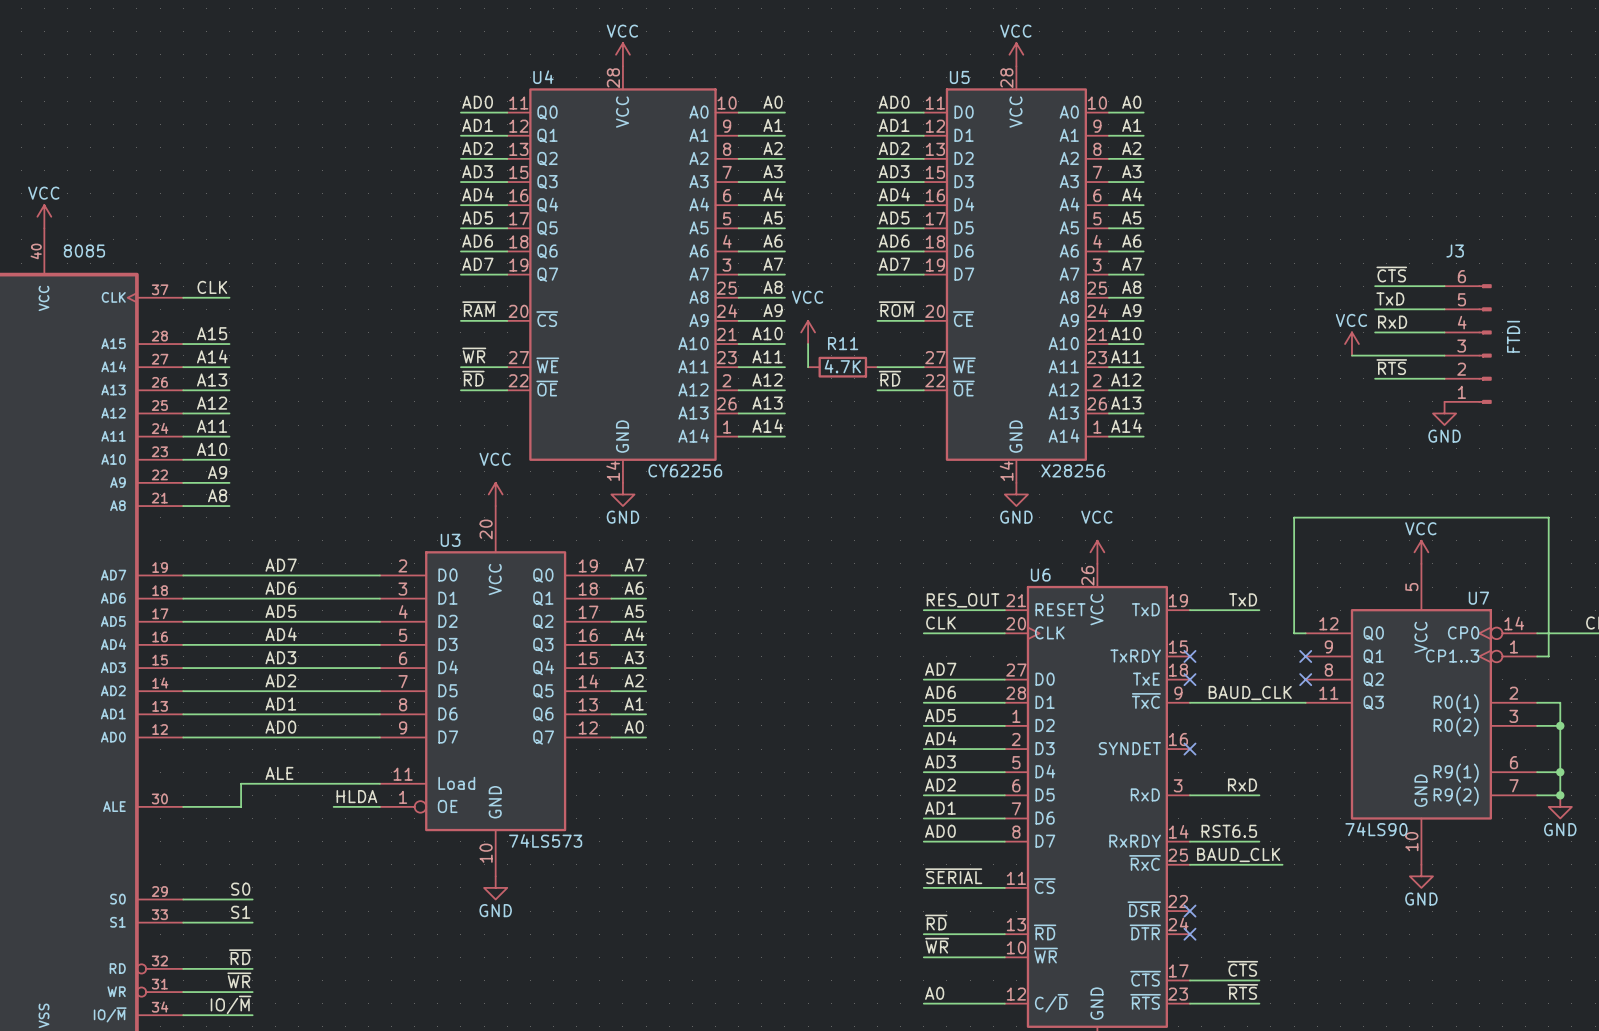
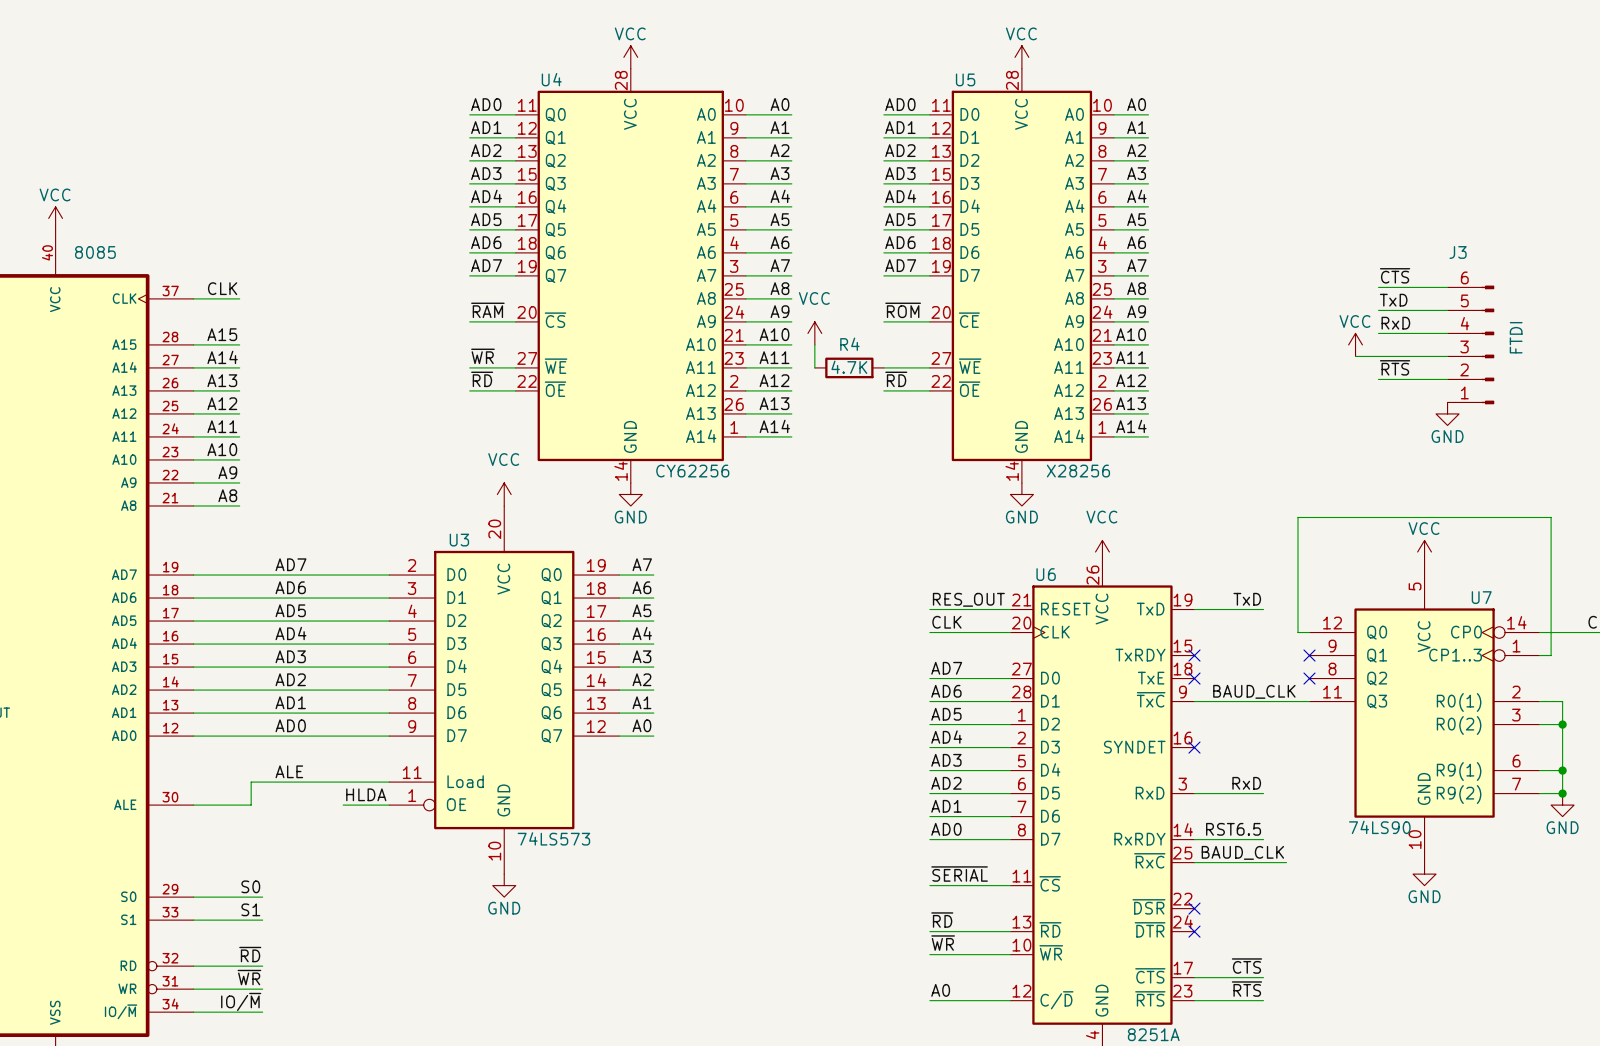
R11 name: R11 (843, 343) -> R4 (849, 344)

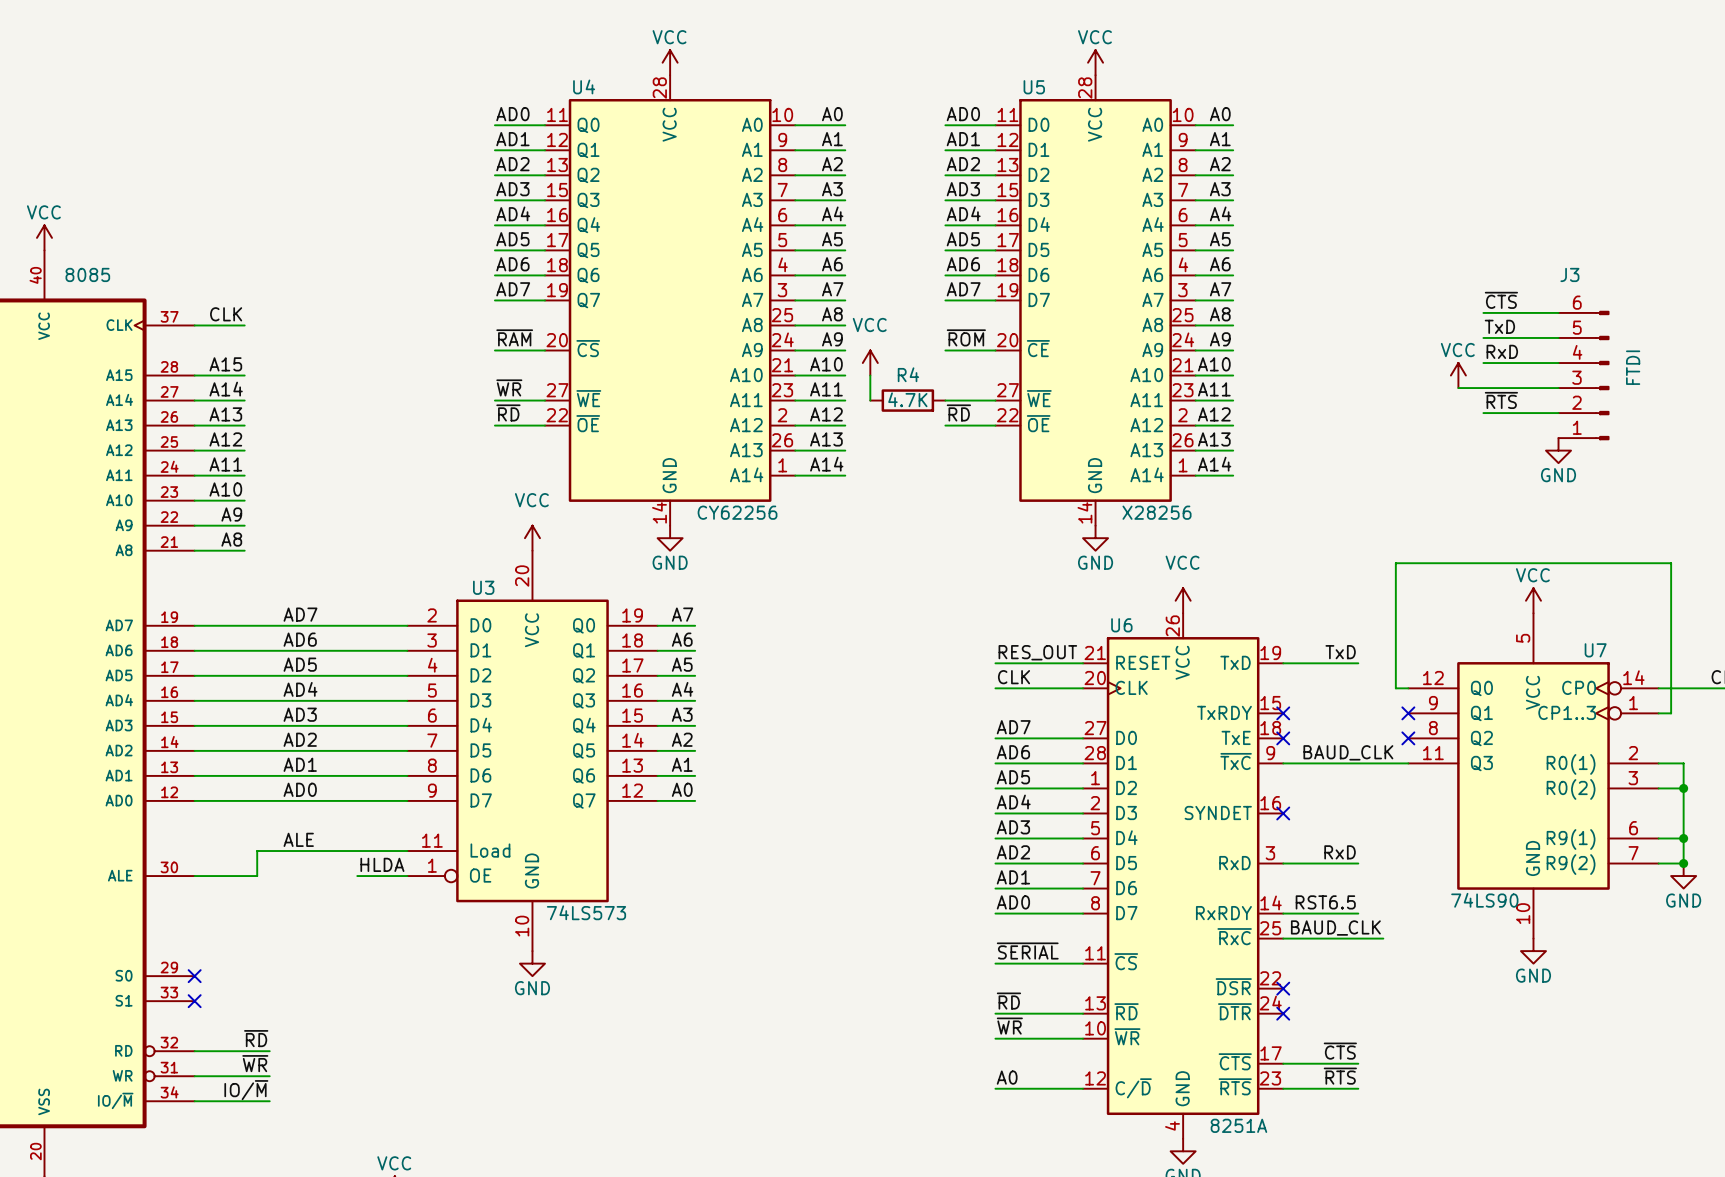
label: S0 (250, 886) -> none
wire: (193, 897) (262, 897) -> none
no-connect mark: none -> (194, 976)
label: S1 (250, 909) -> none
wire: (193, 920) (262, 920) -> none
no-connect mark: none -> (194, 1001)

